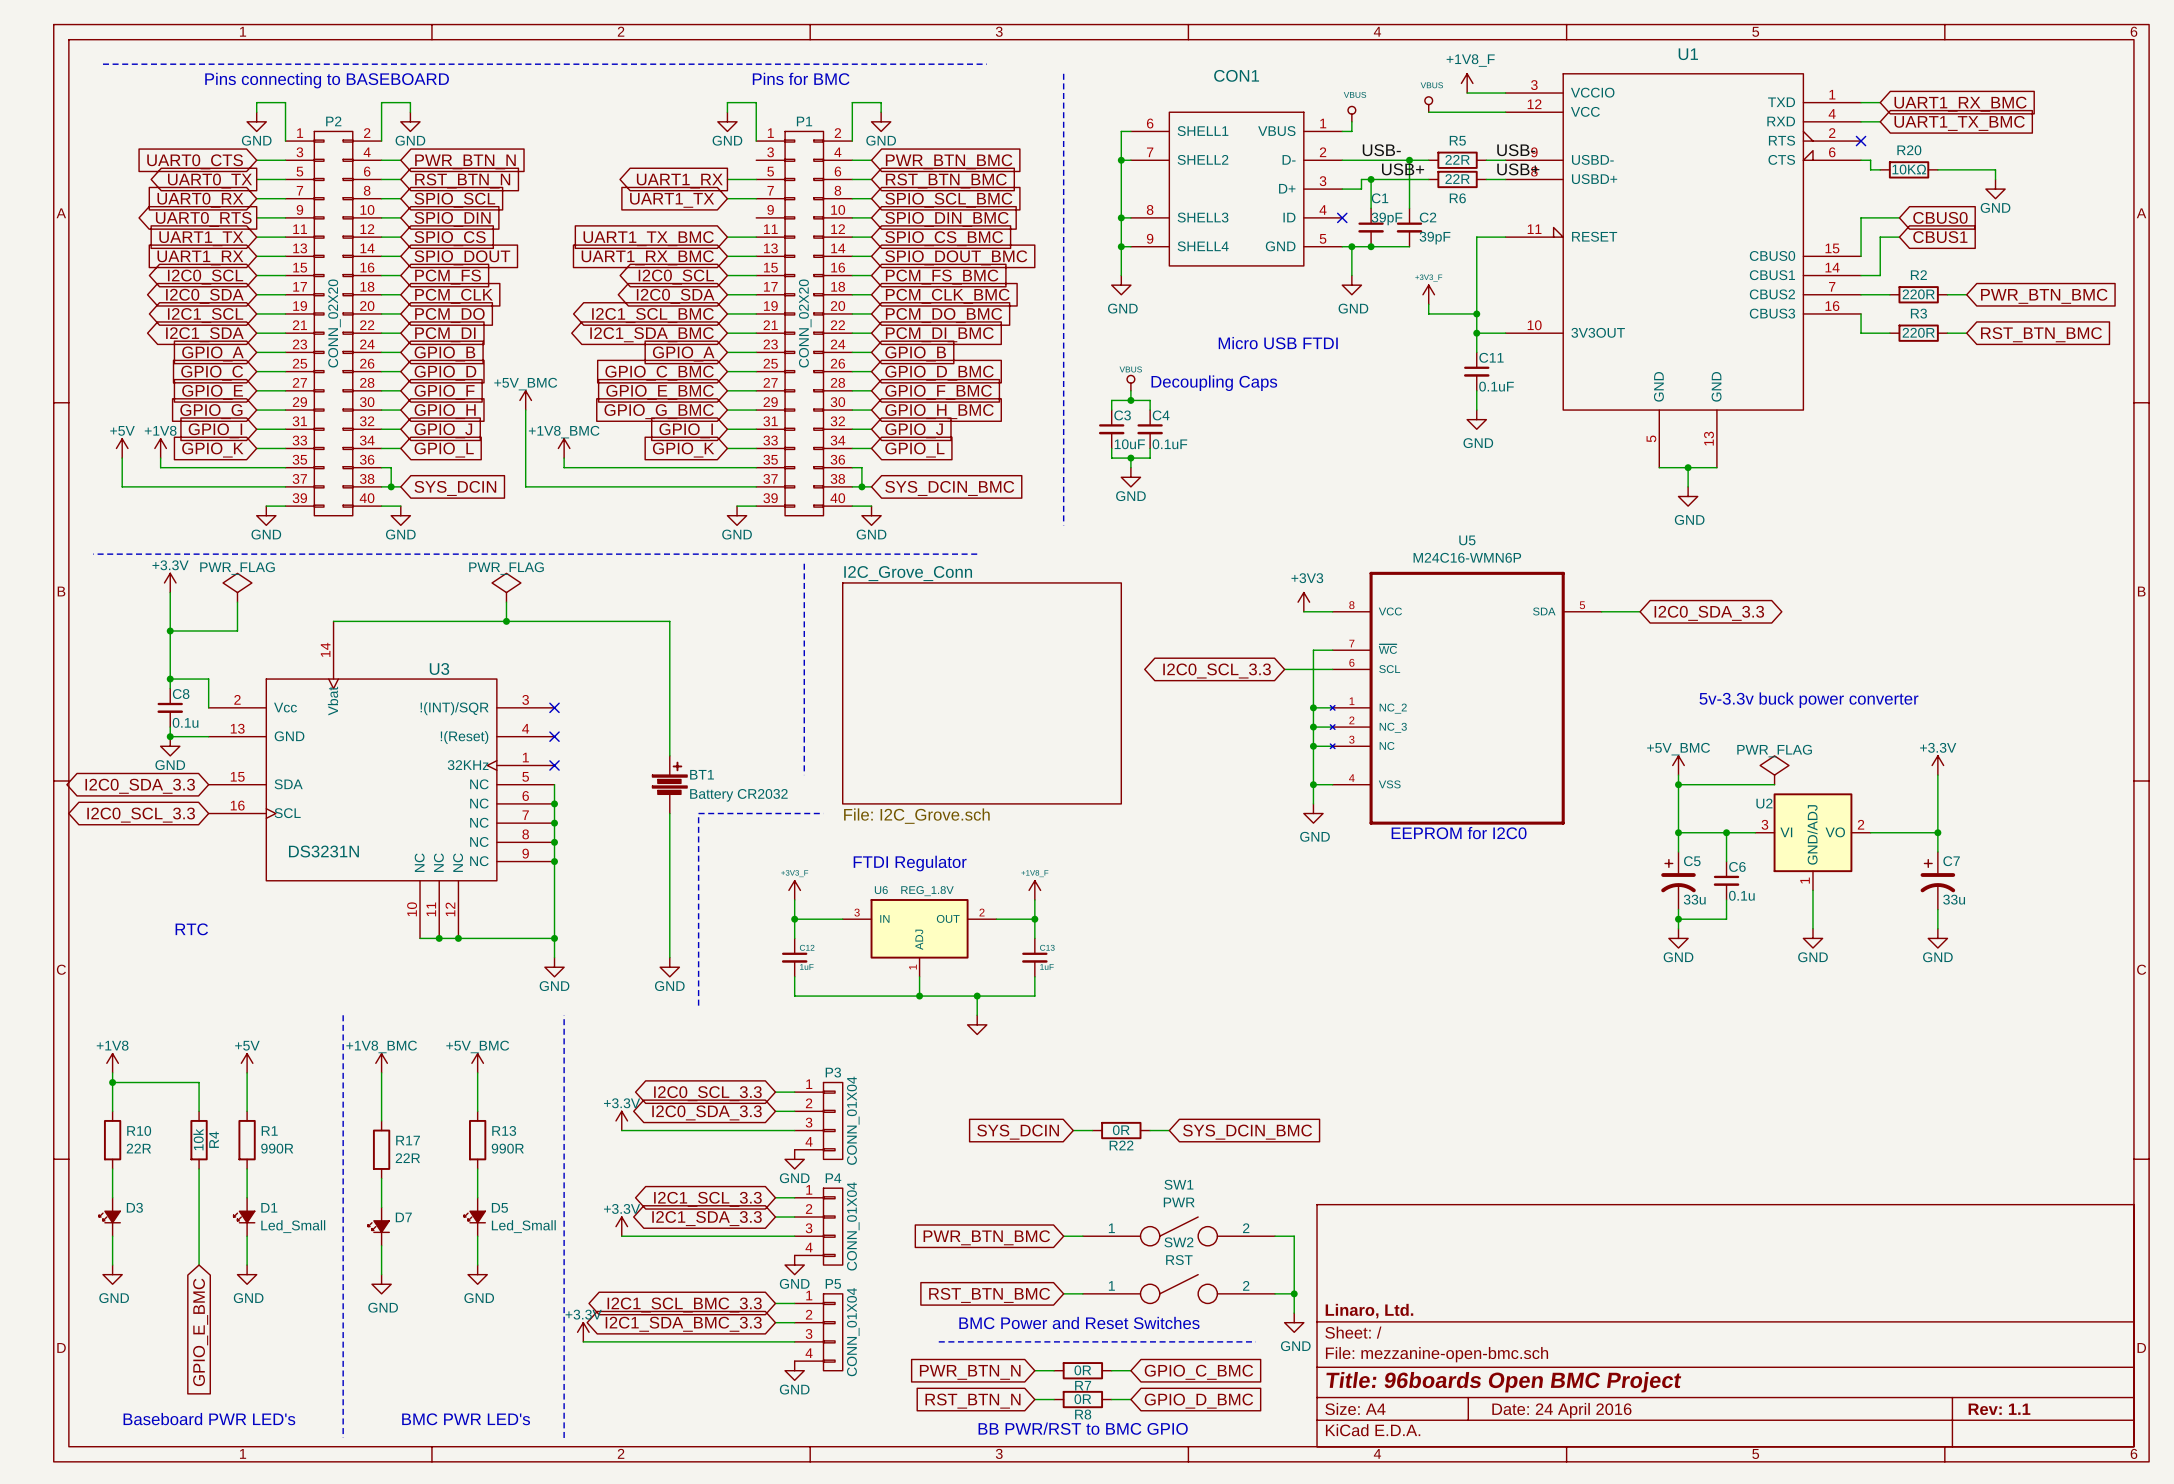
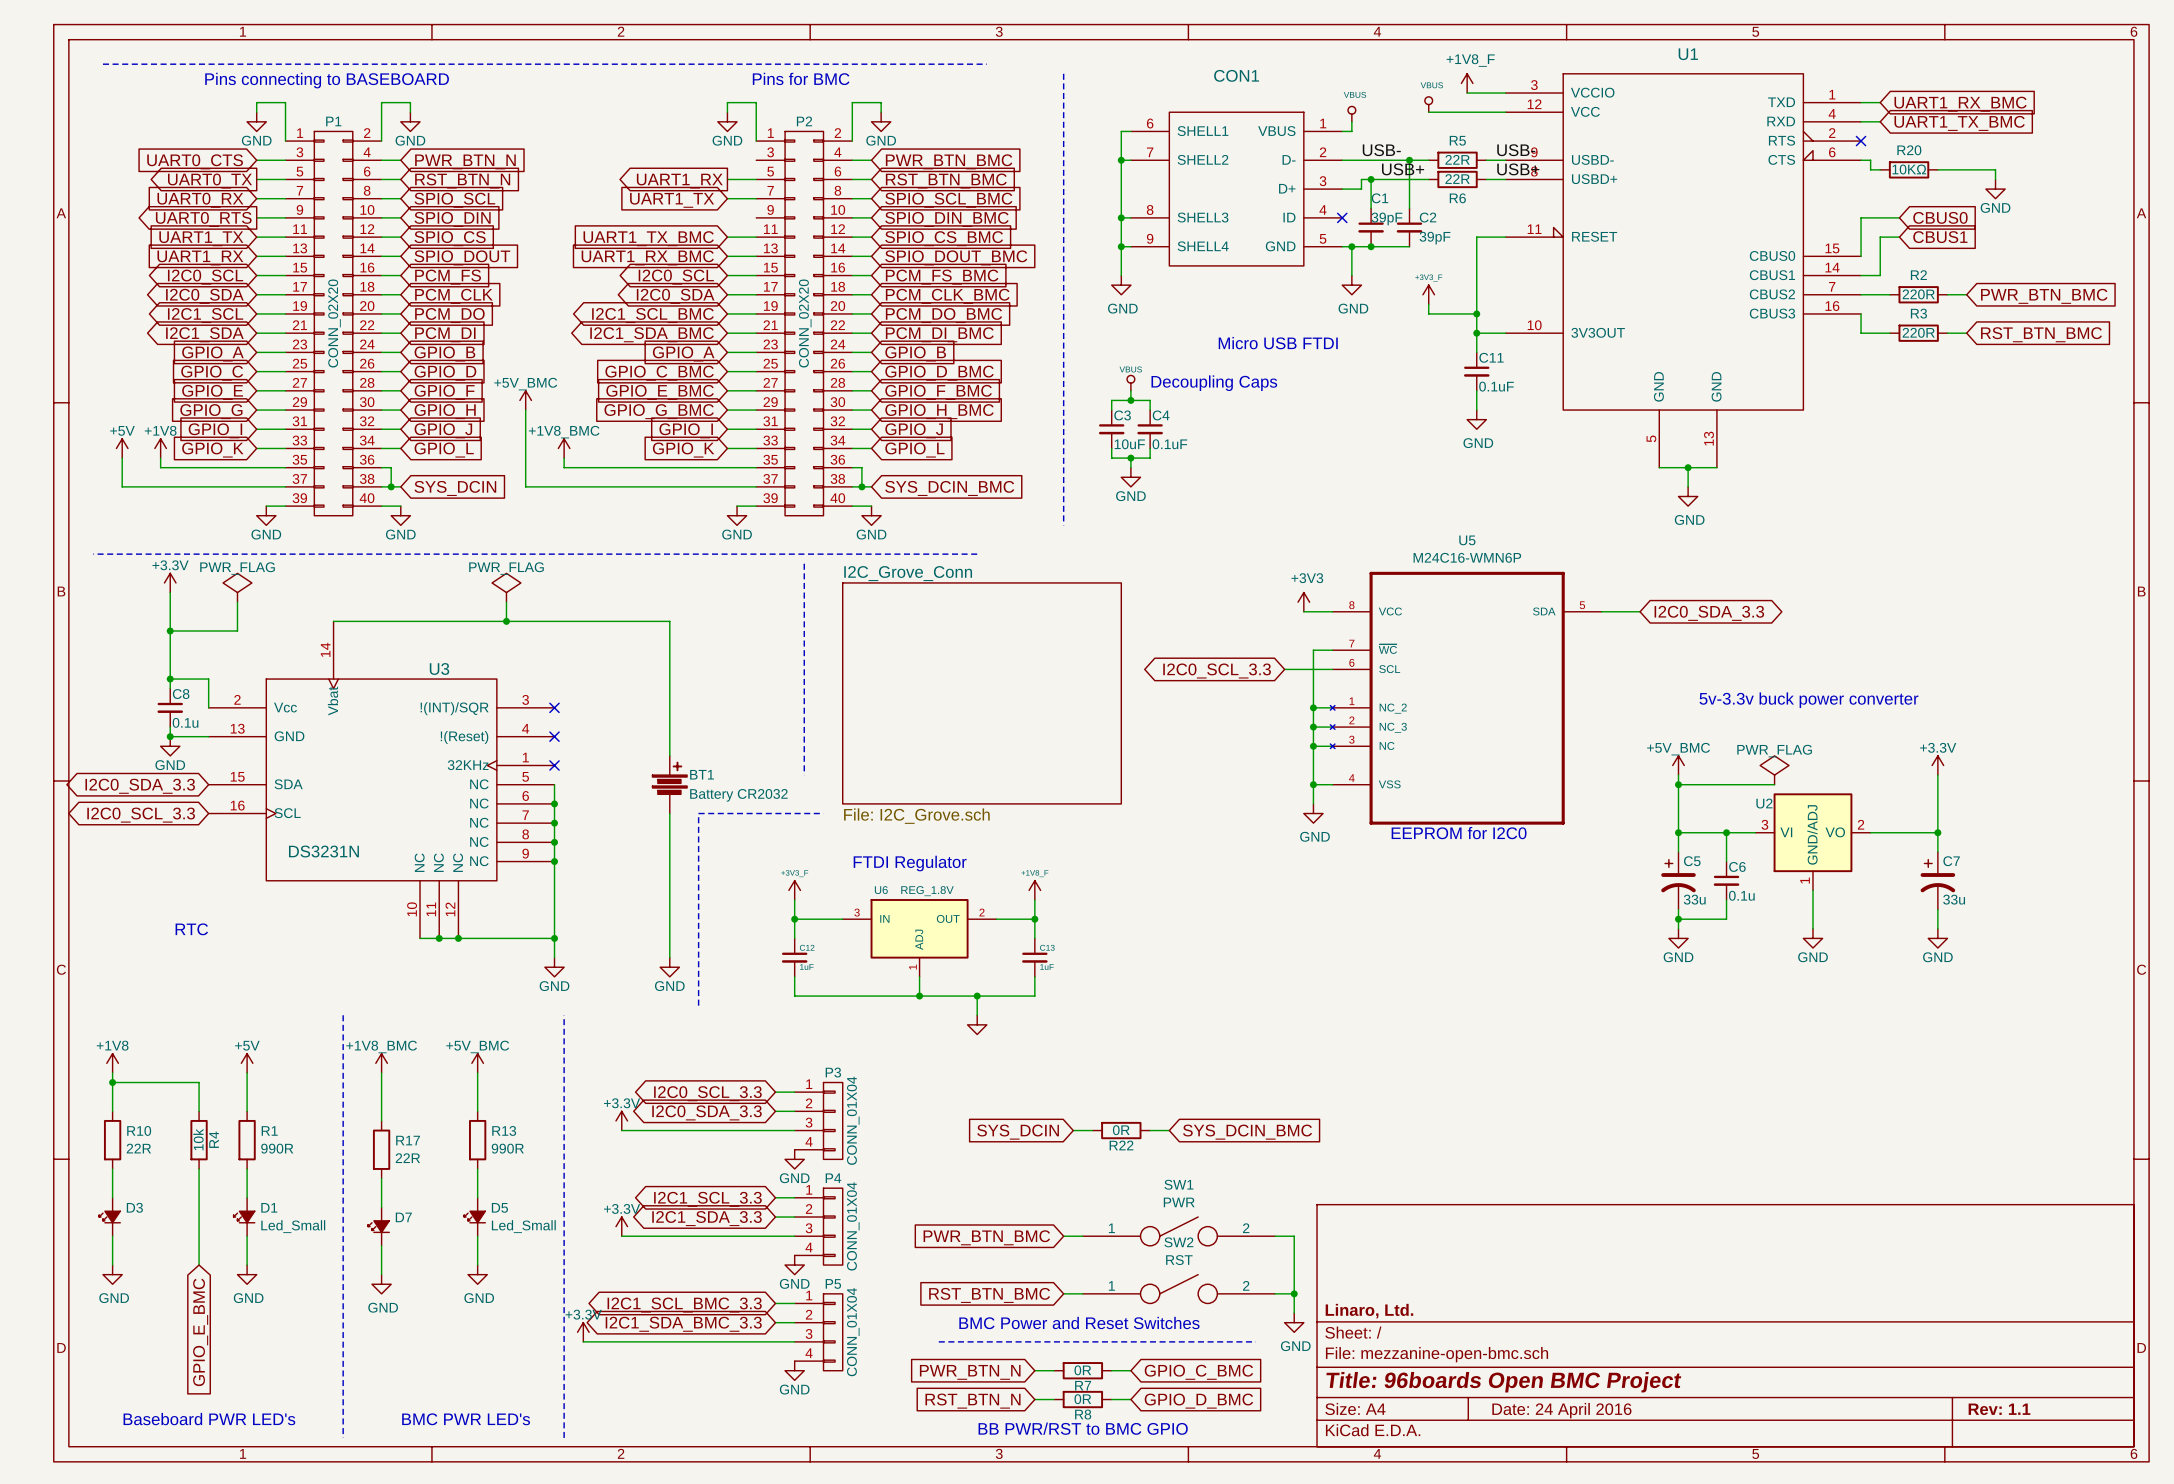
P2 name: P2 (333, 121) -> P1 (333, 121)
P1 name: P1 (804, 121) -> P2 (804, 121)

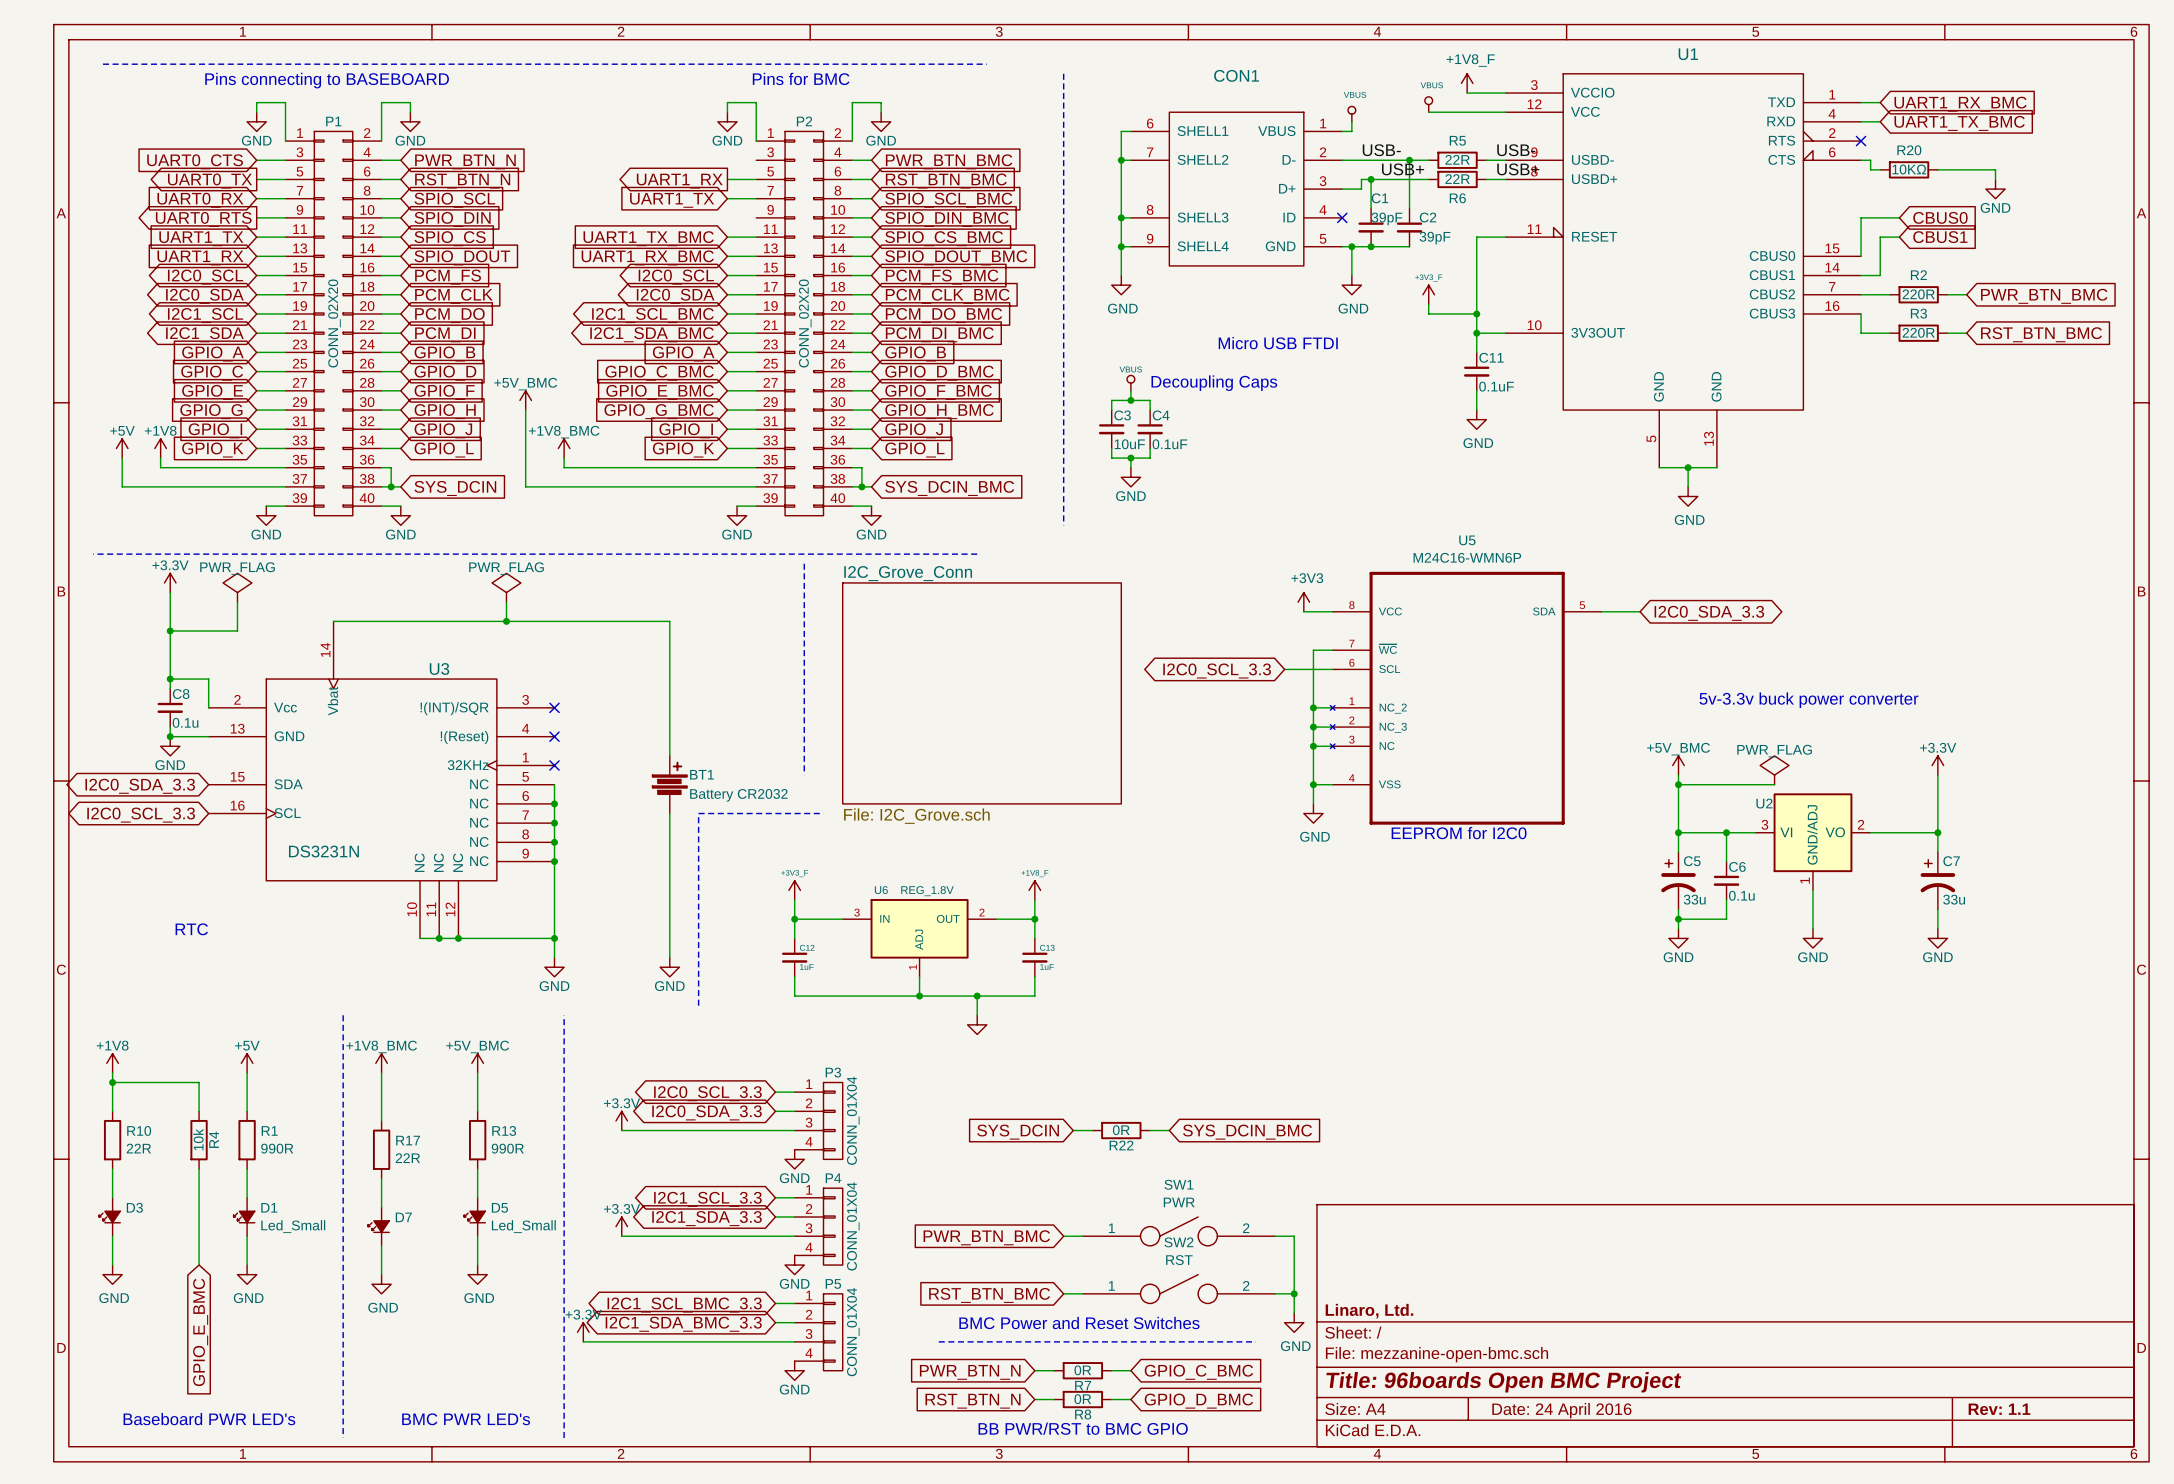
text: FTDI Regulator (910, 863) -> none

